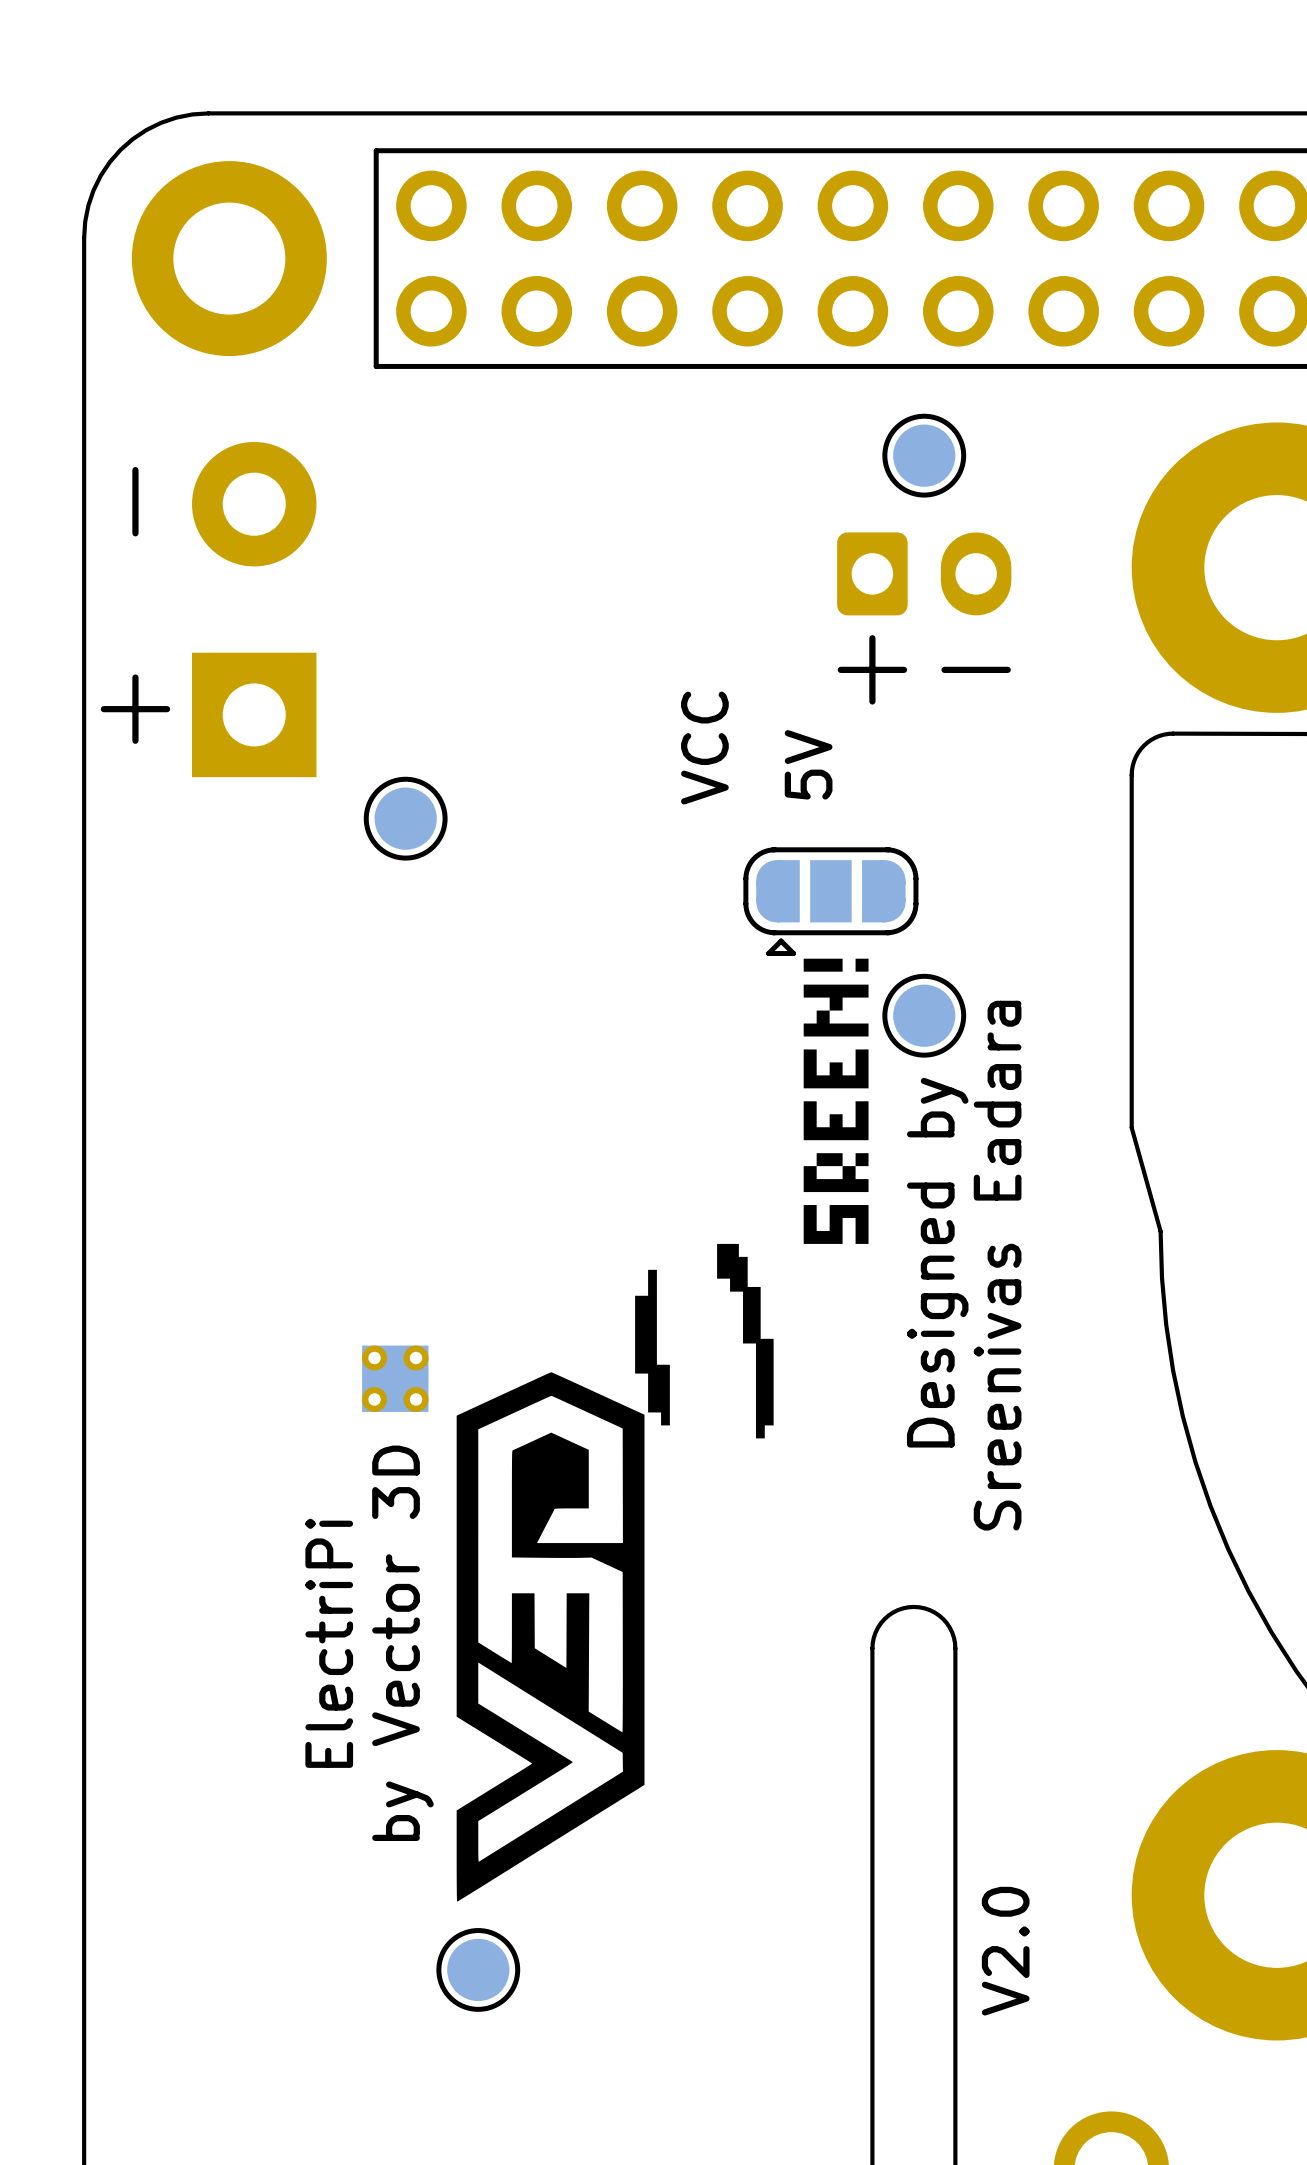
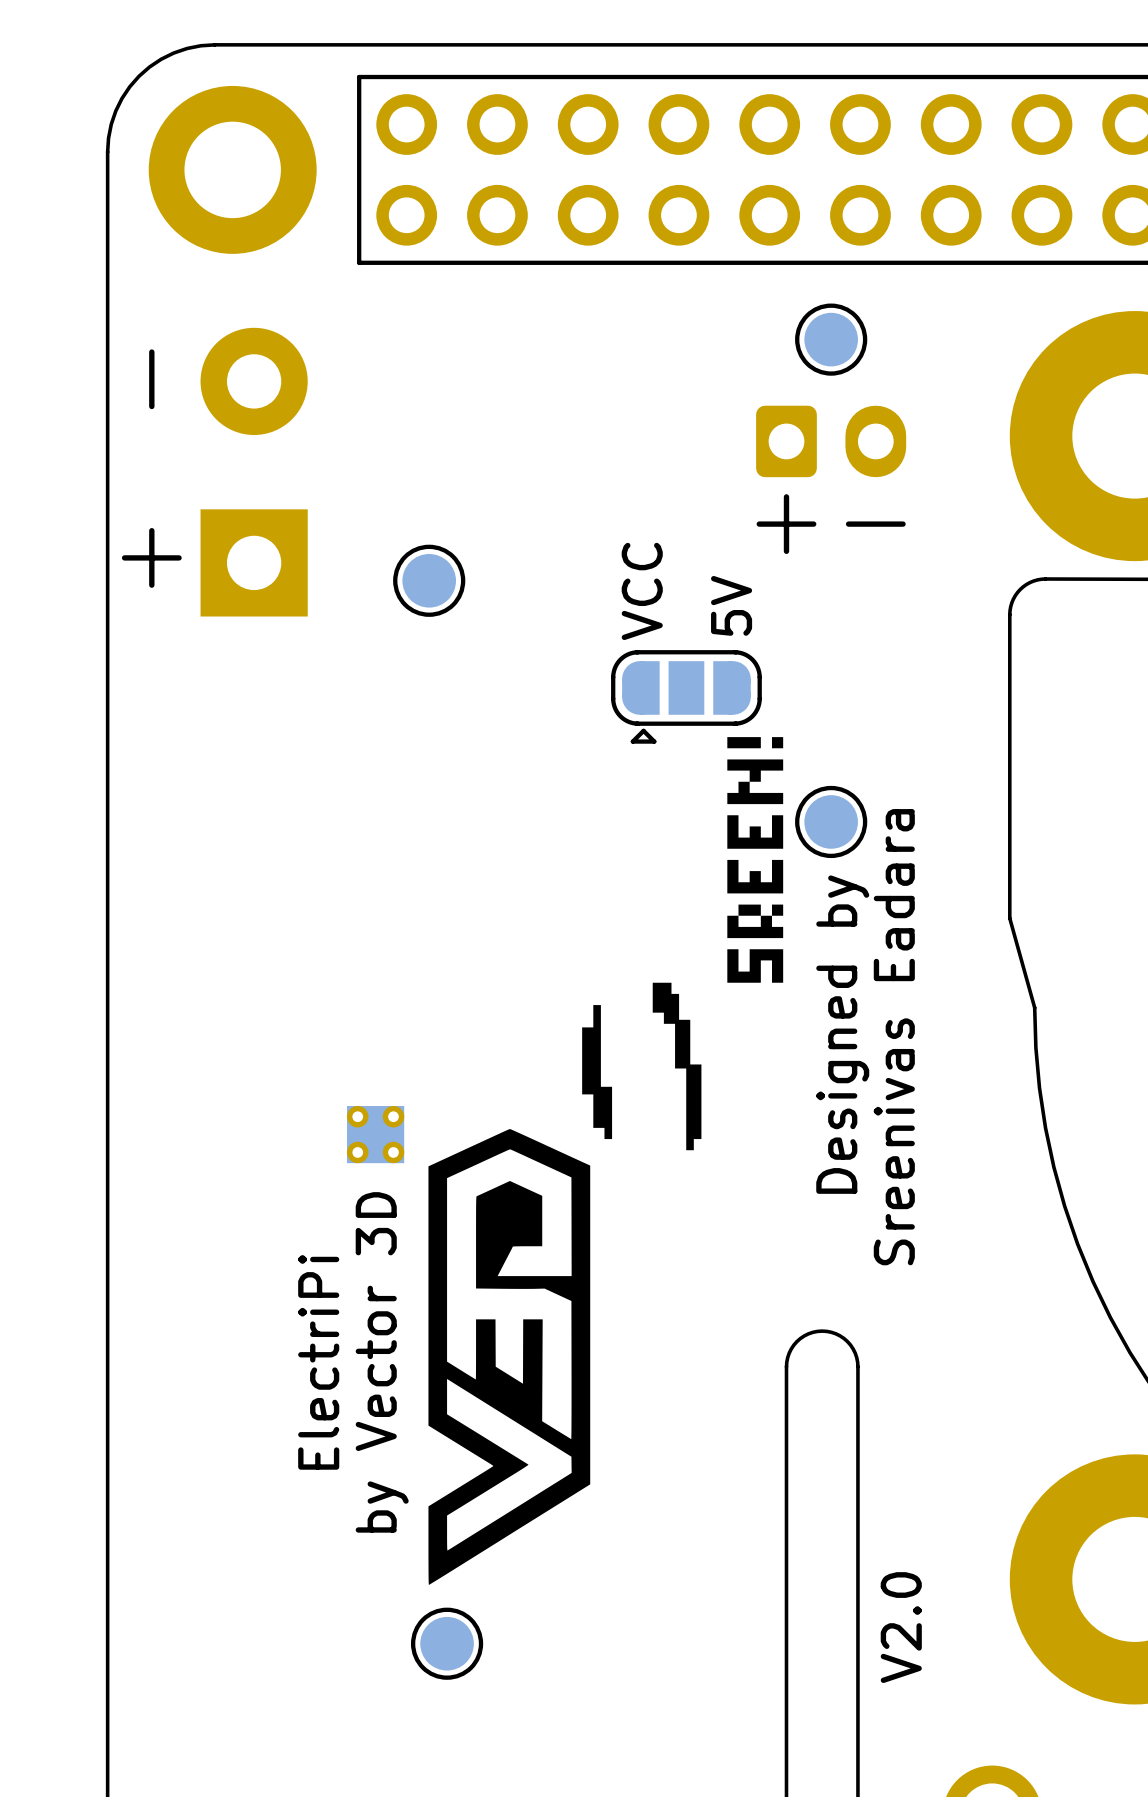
part position: (405, 818) -> (429, 580)
part position: (830, 901) -> (686, 696)
drawing position: (751, 1198) -> (682, 943)

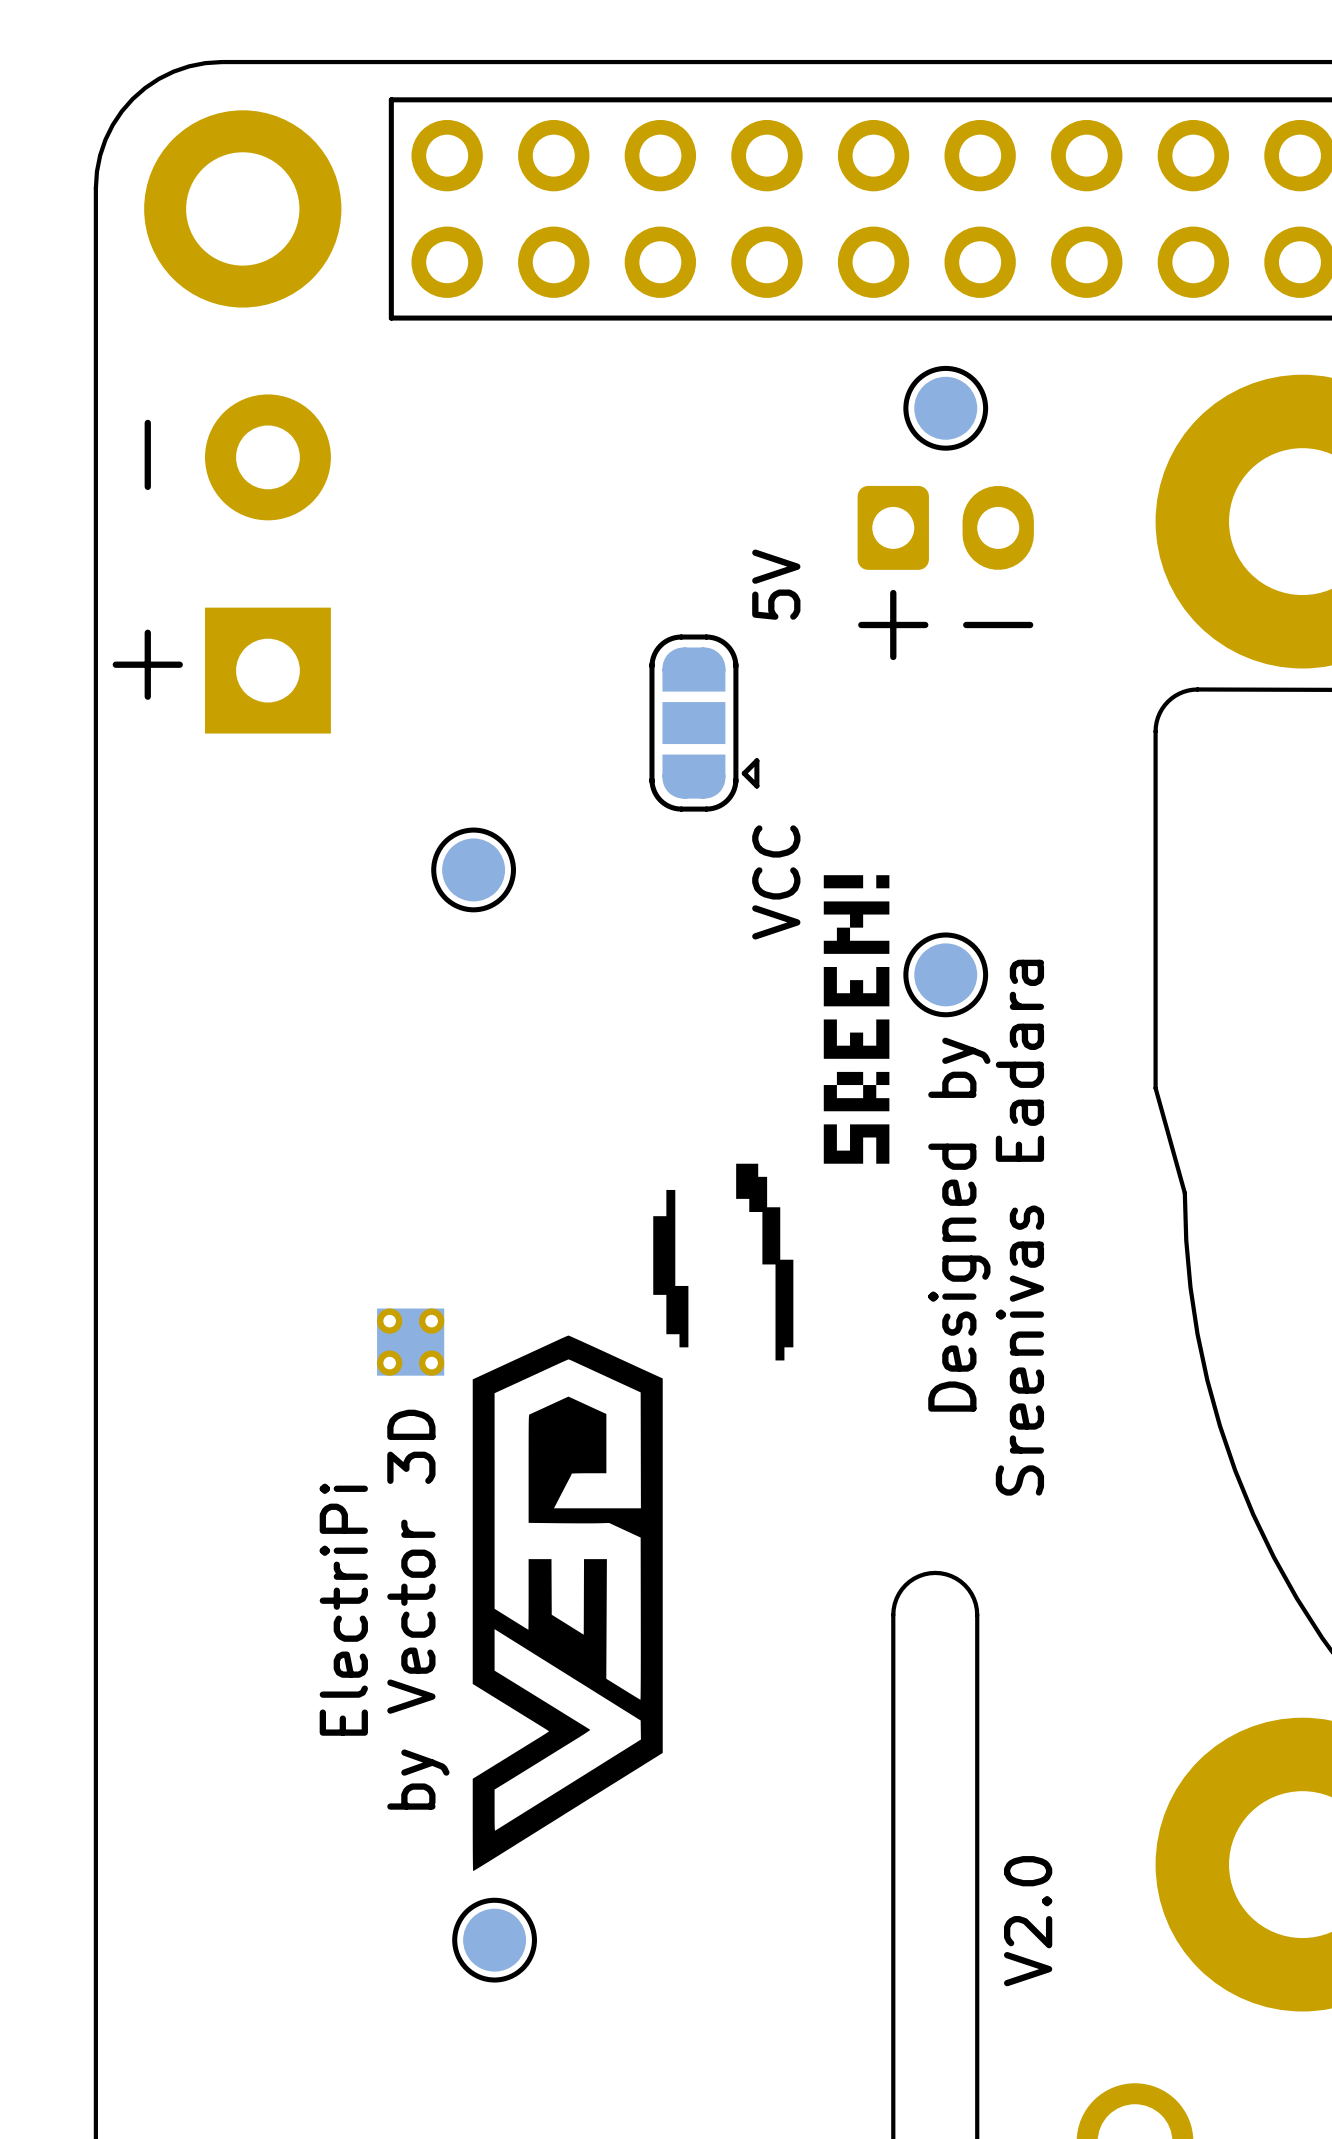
part position: (429, 580) -> (473, 869)
text position: VCC (642, 591) -> VCC (776, 882)
text position: 5V (731, 605) -> 5V (776, 584)
part rotation: 0° (686, 696) -> 90° counterclockwise (704, 723)
part position: (686, 696) -> (704, 723)

